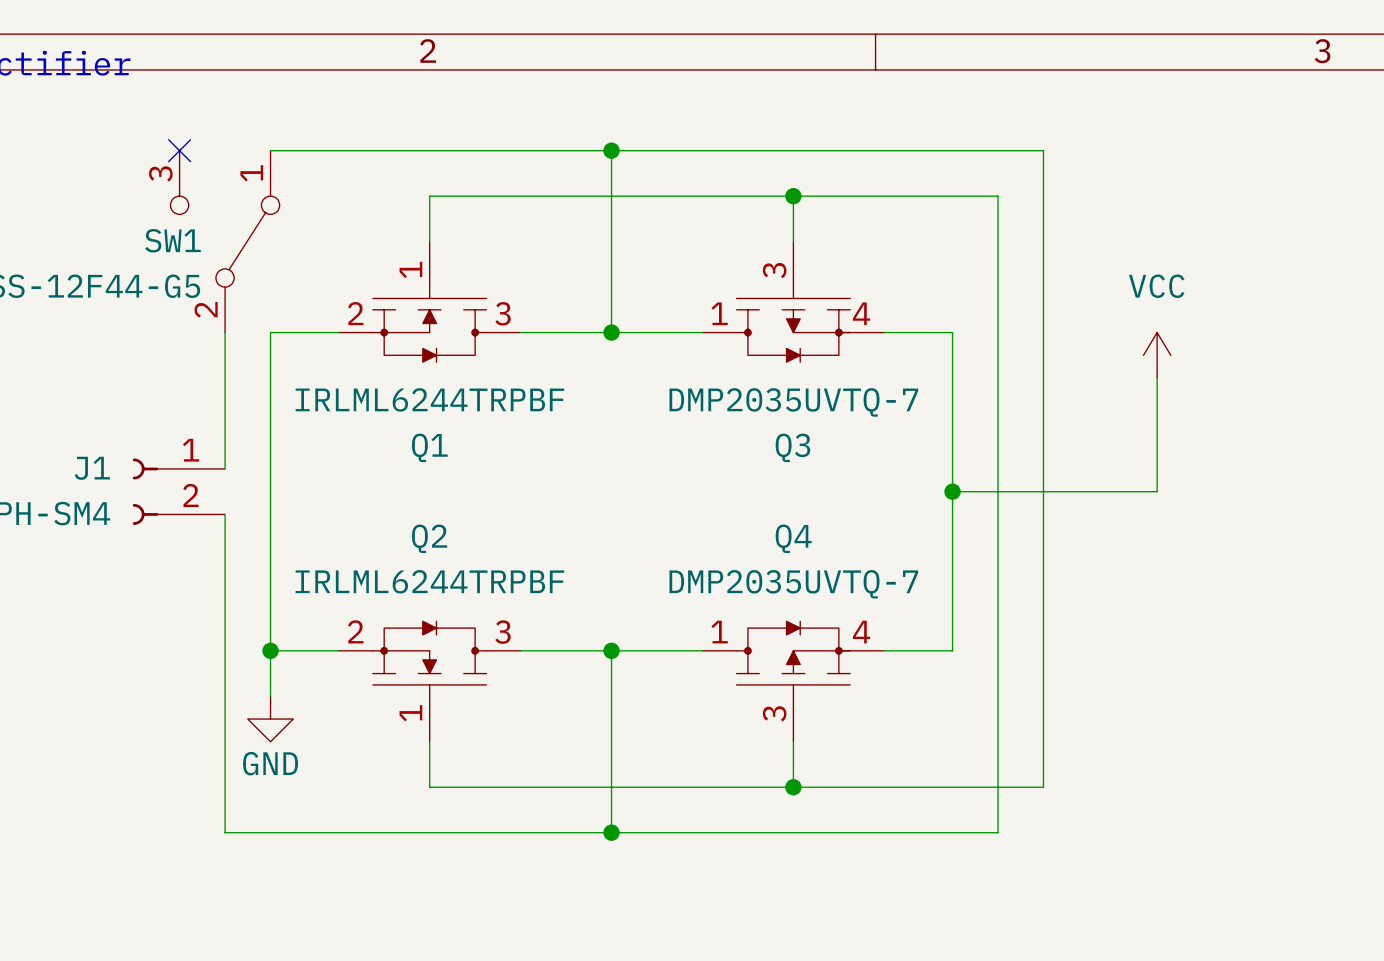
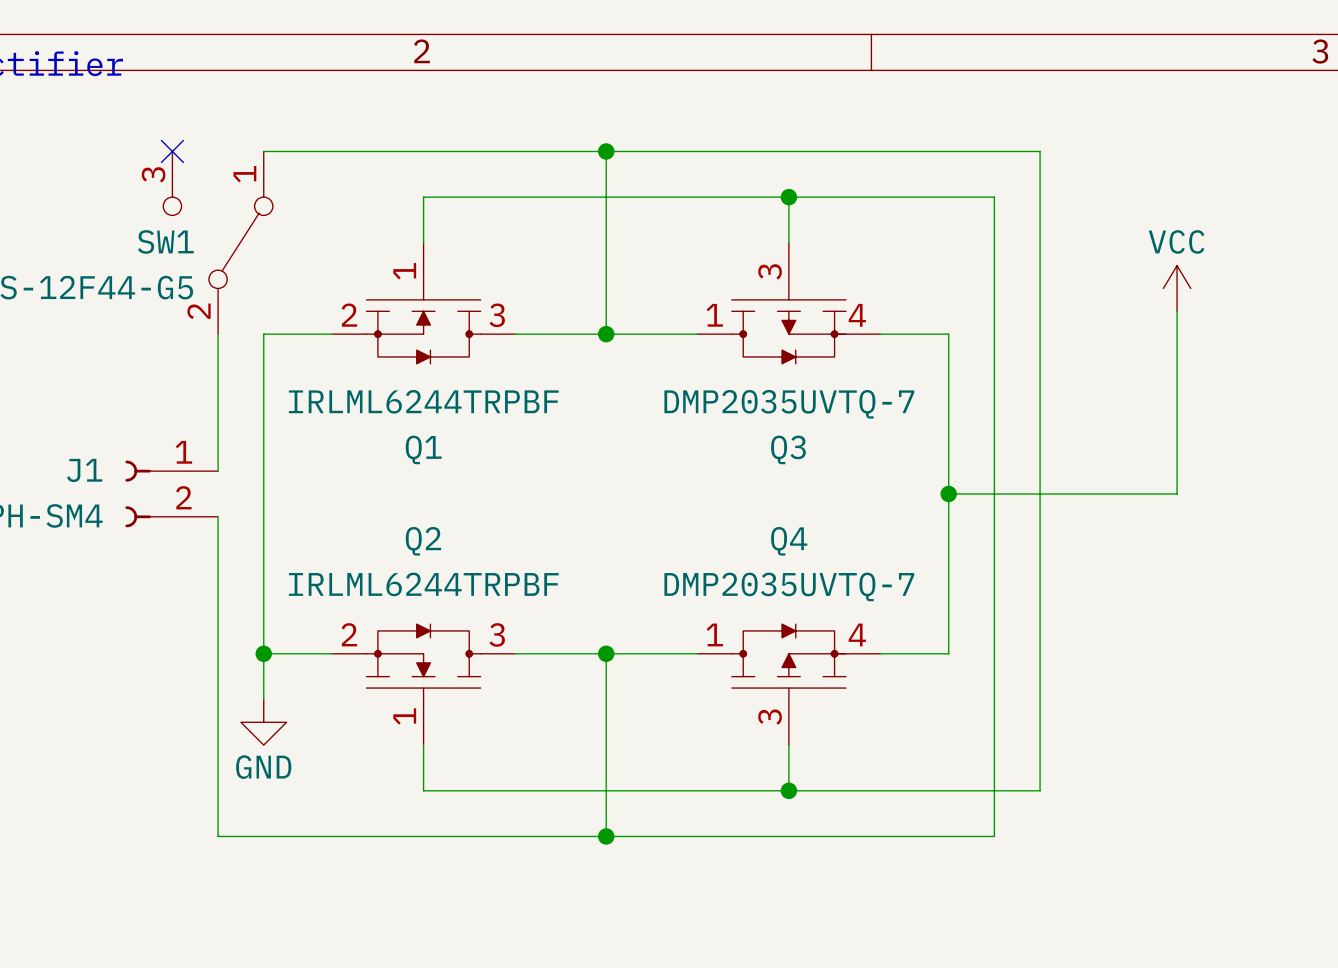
power symbol text position: VCC (1156, 286) -> VCC (1176, 241)
power symbol position: VCC (1157, 355) -> VCC (1177, 288)
wire: (1157, 378) (1157, 491) -> (1177, 311) (1177, 493) (1154, 493)

